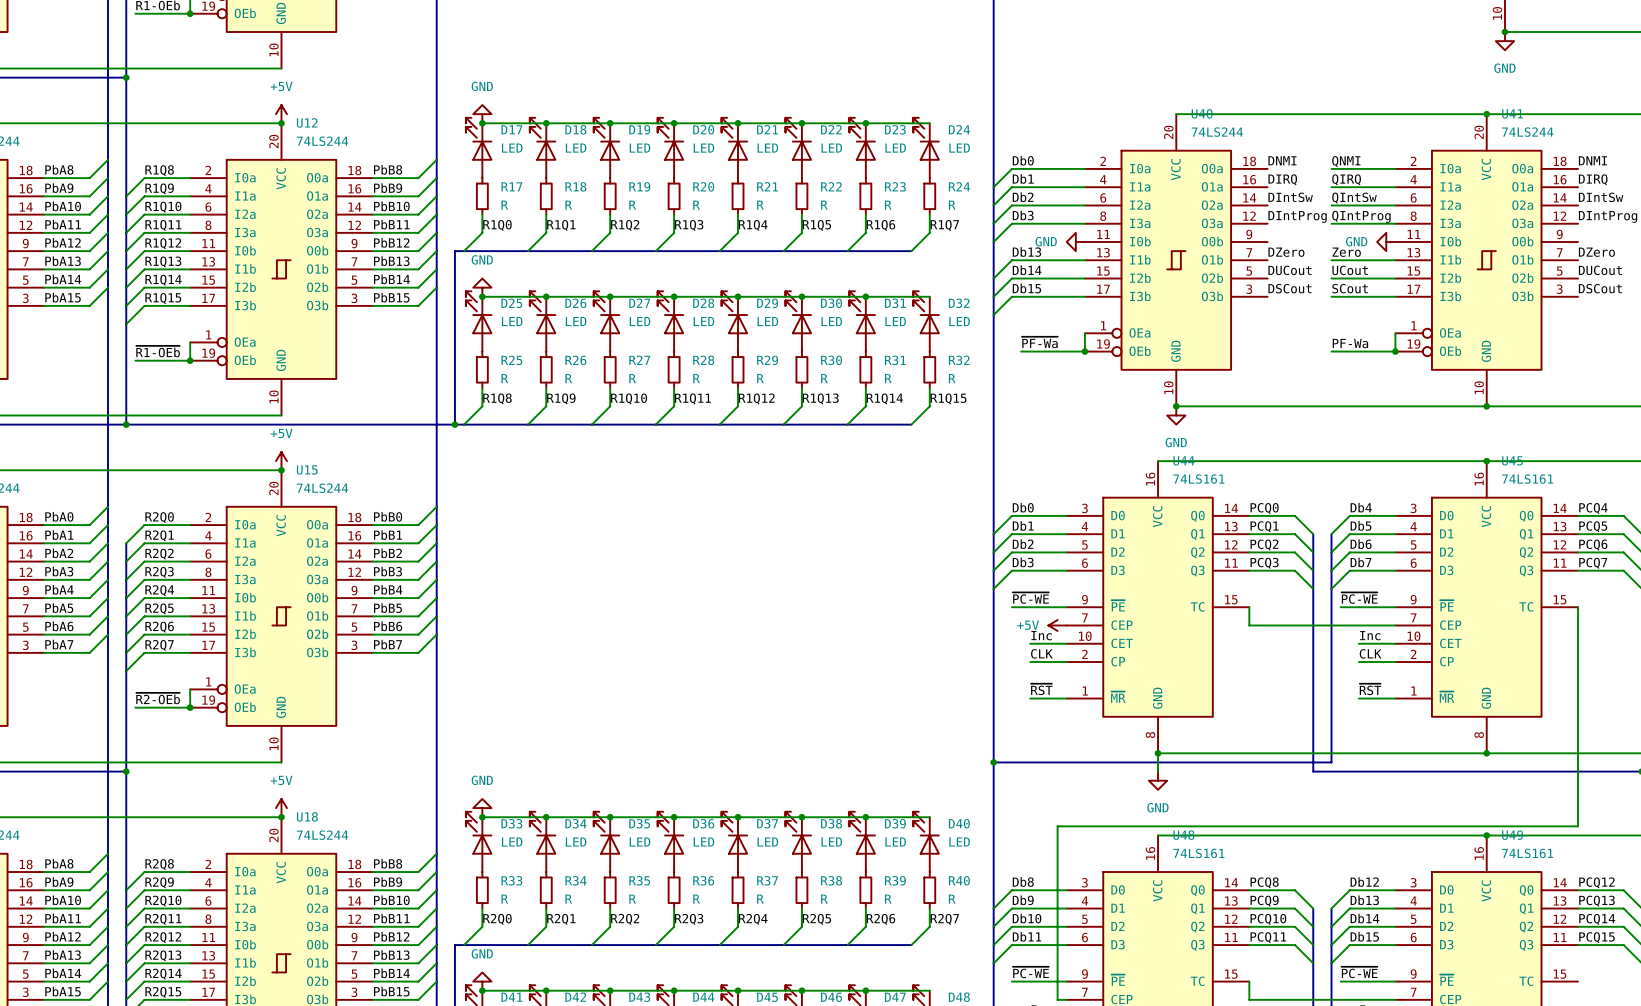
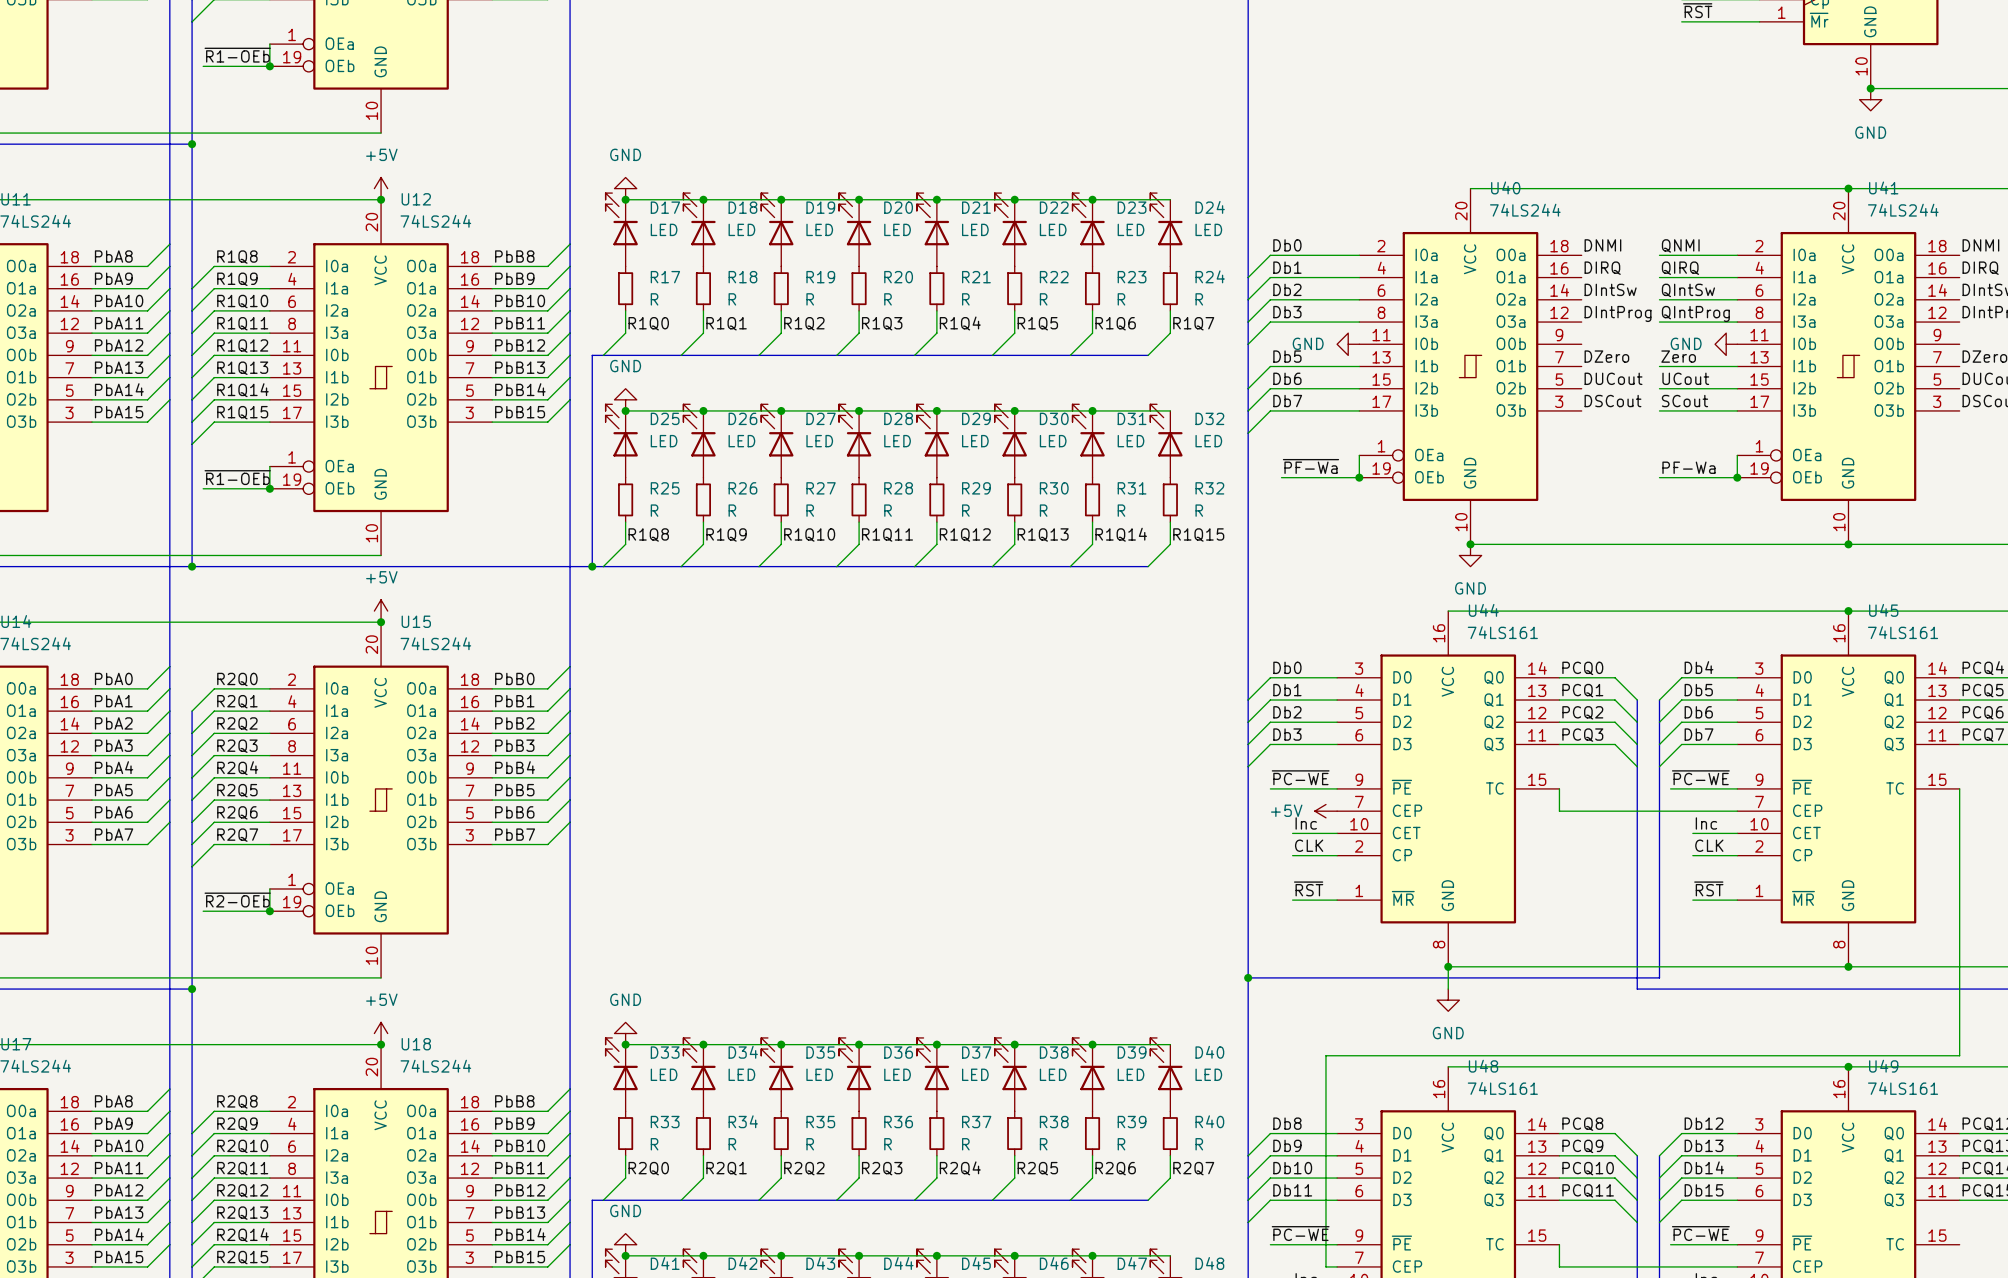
label: Db13 (1026, 252) -> Db5 (1287, 356)
label: Db14 (1027, 270) -> Db6 (1287, 378)
label: Db15 (1026, 288) -> Db7 (1287, 401)

